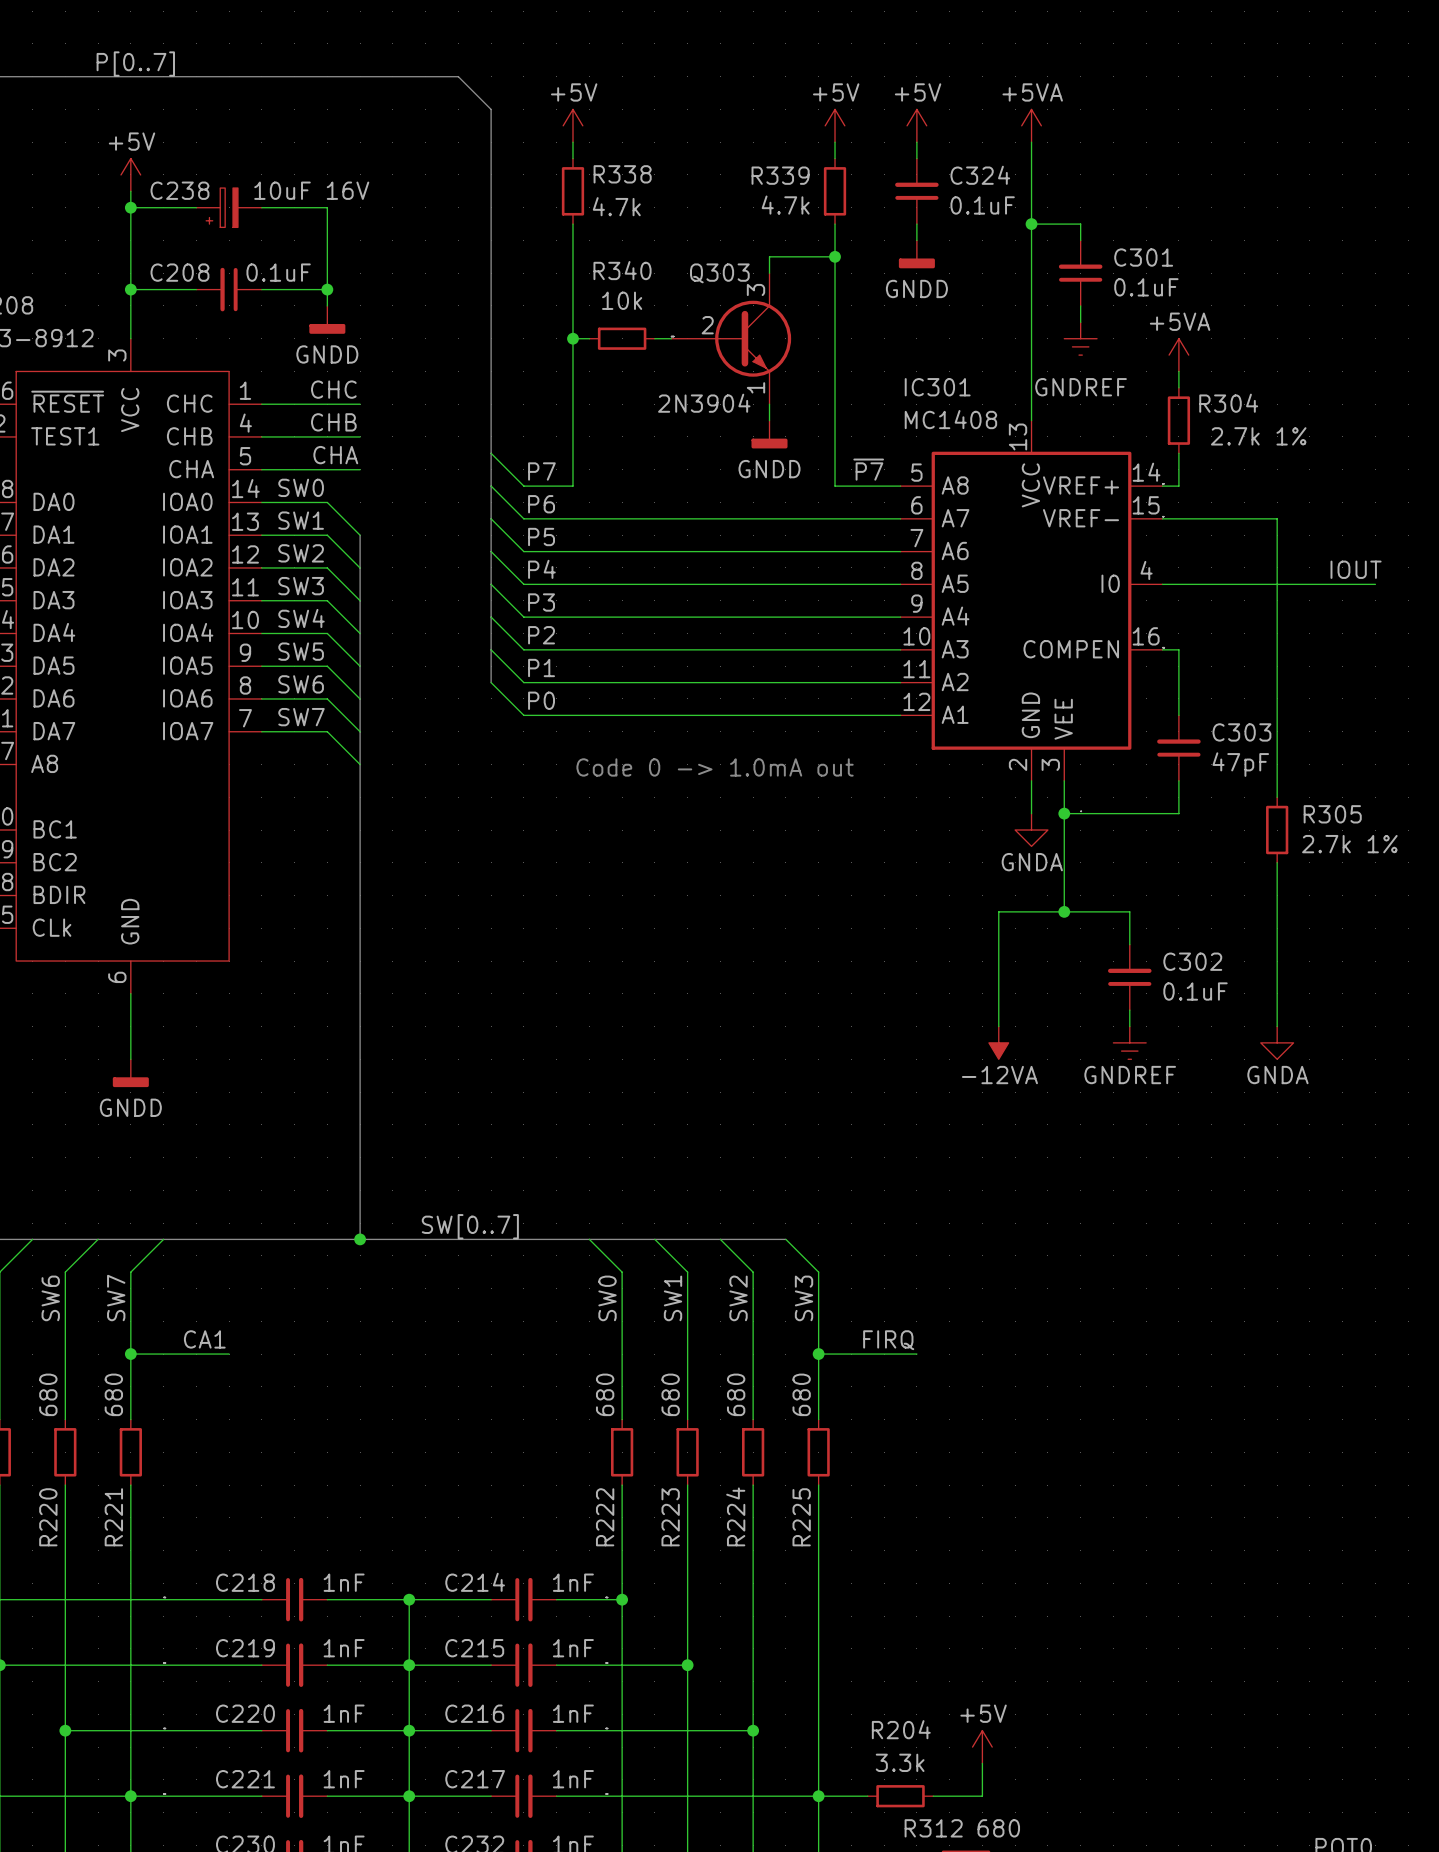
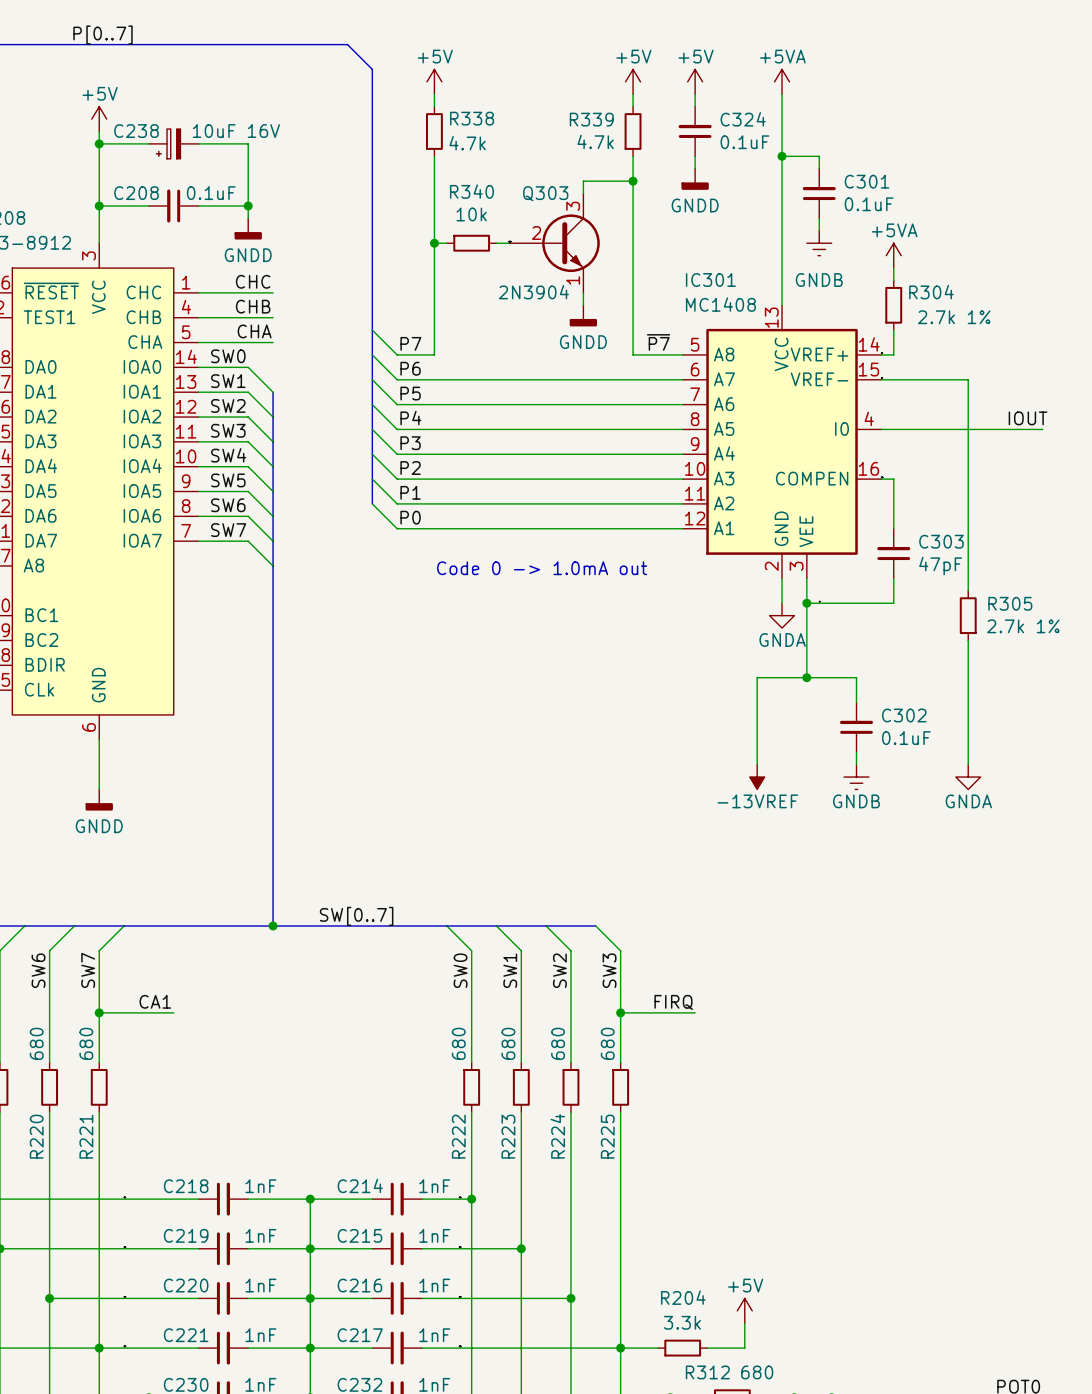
power symbol: GNDREF (1080, 338) -> GNDB (819, 243)
power symbol: -12VA (998, 1042) -> -13VREF (757, 777)
power symbol: GNDREF (1129, 1042) -> GNDB (856, 777)

